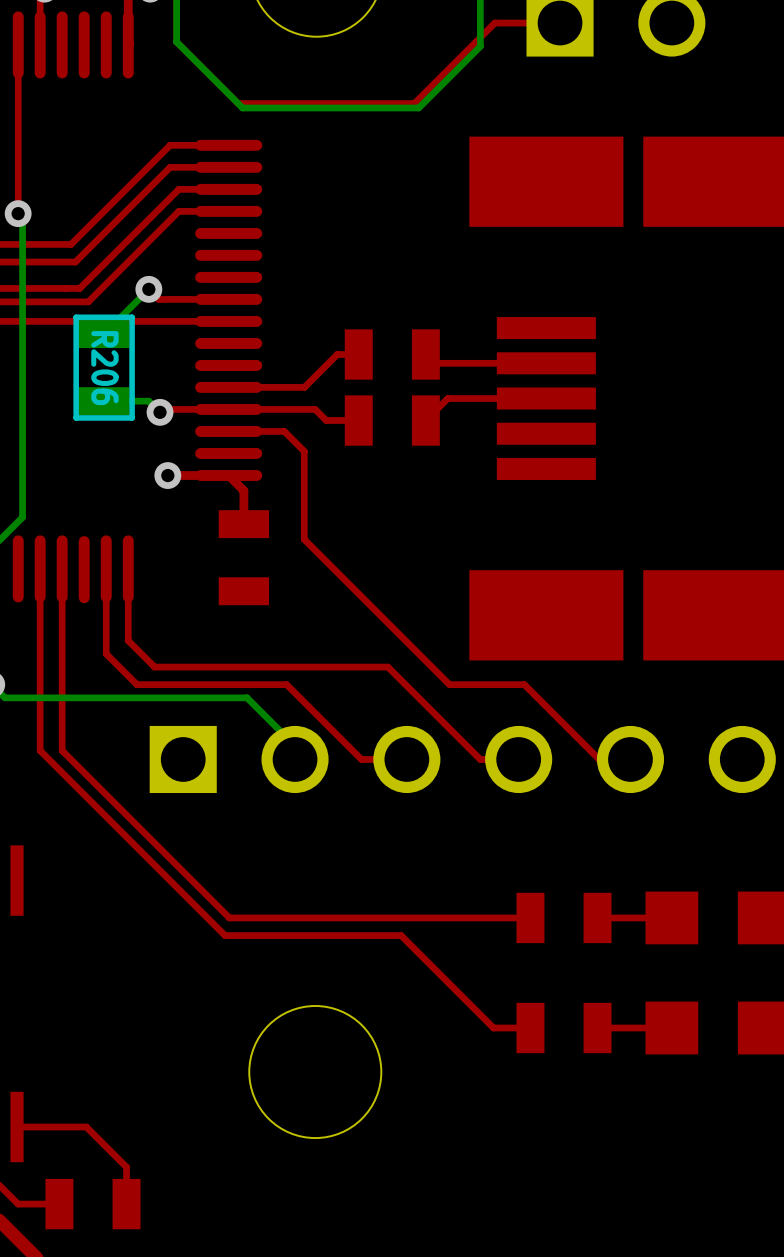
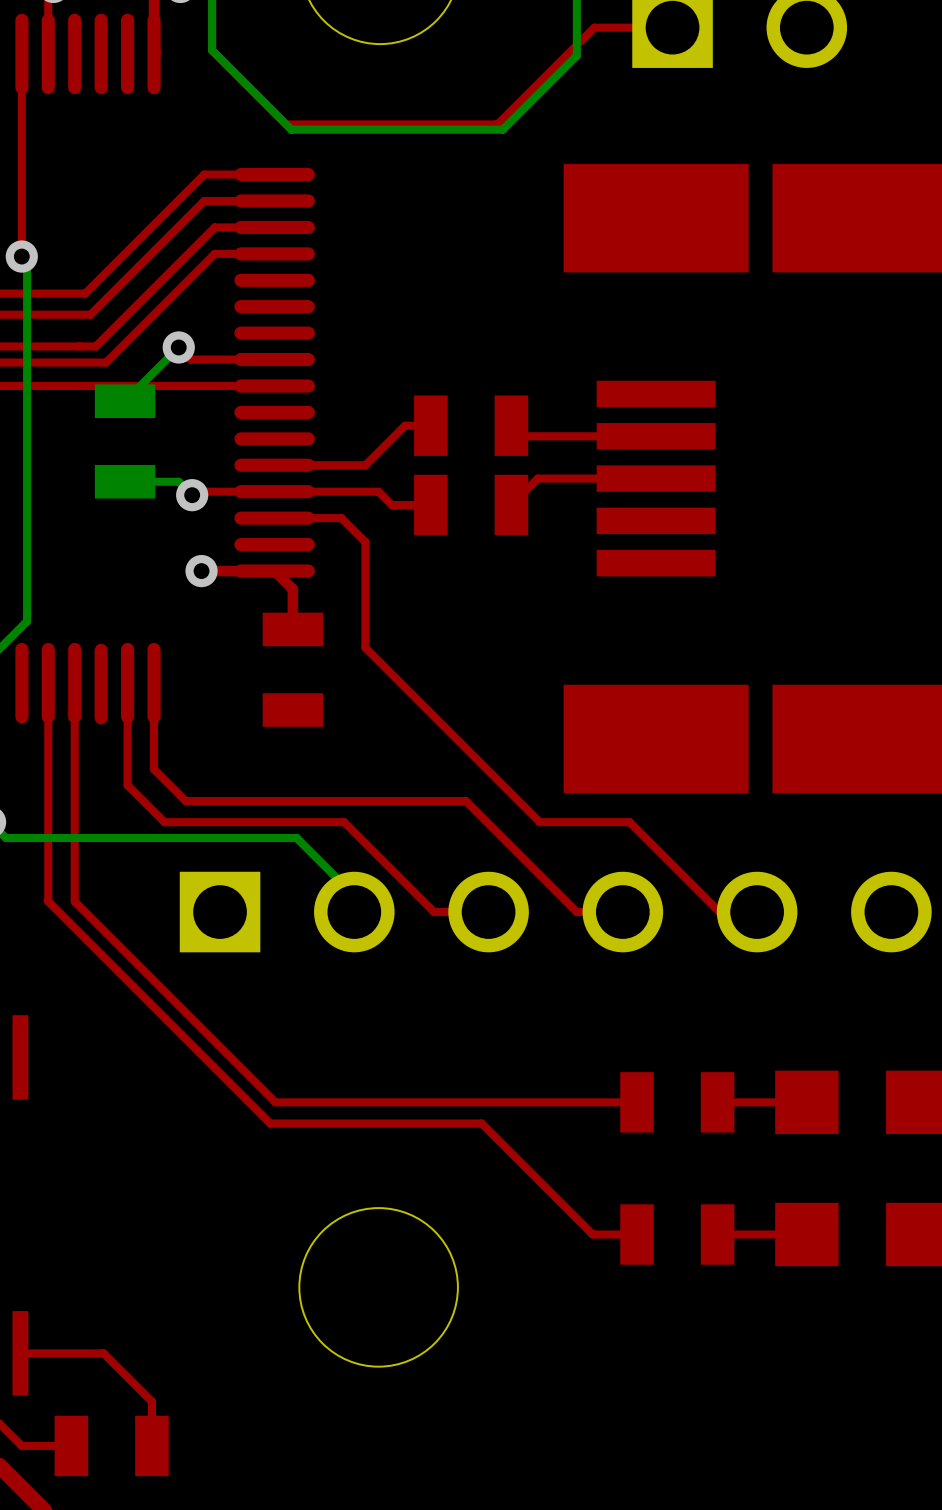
R206: (104, 367) -> none
part: none -> (125, 441)

